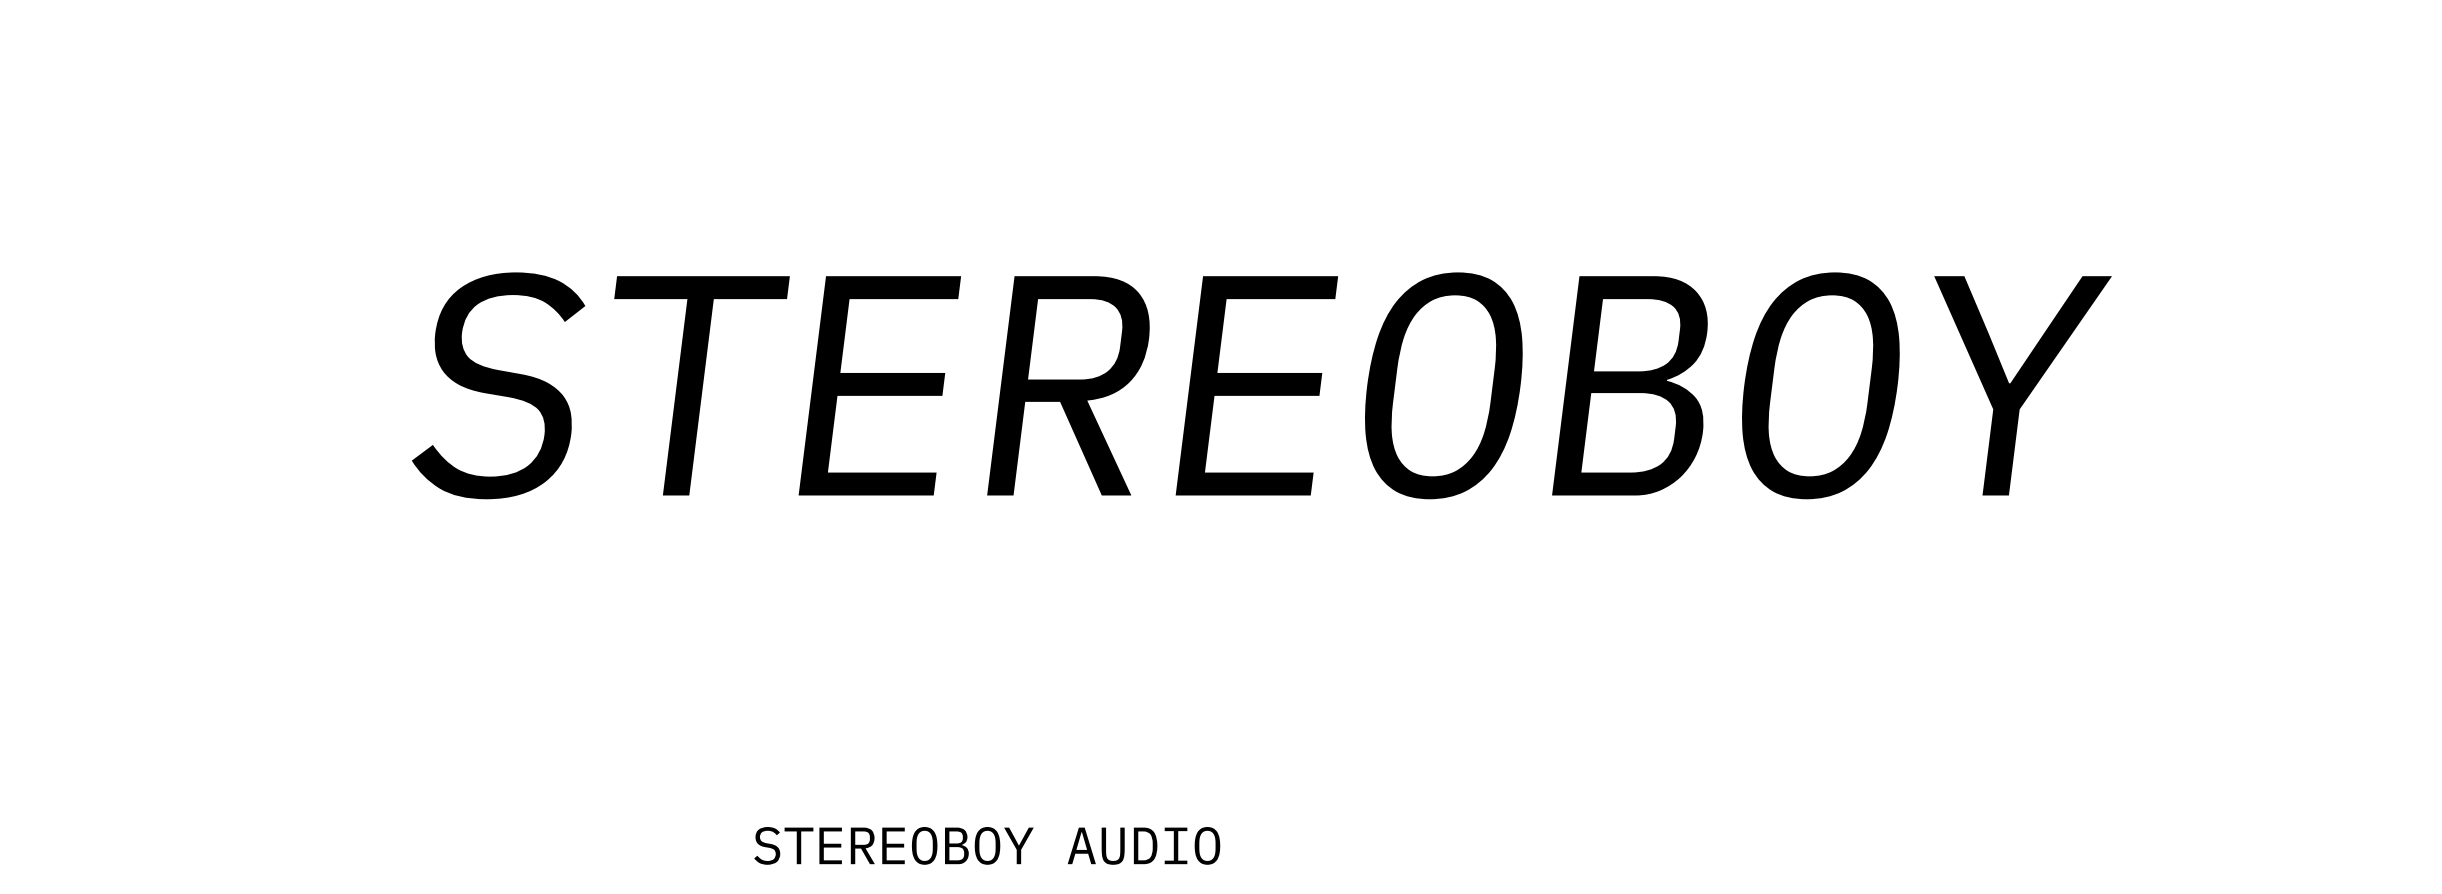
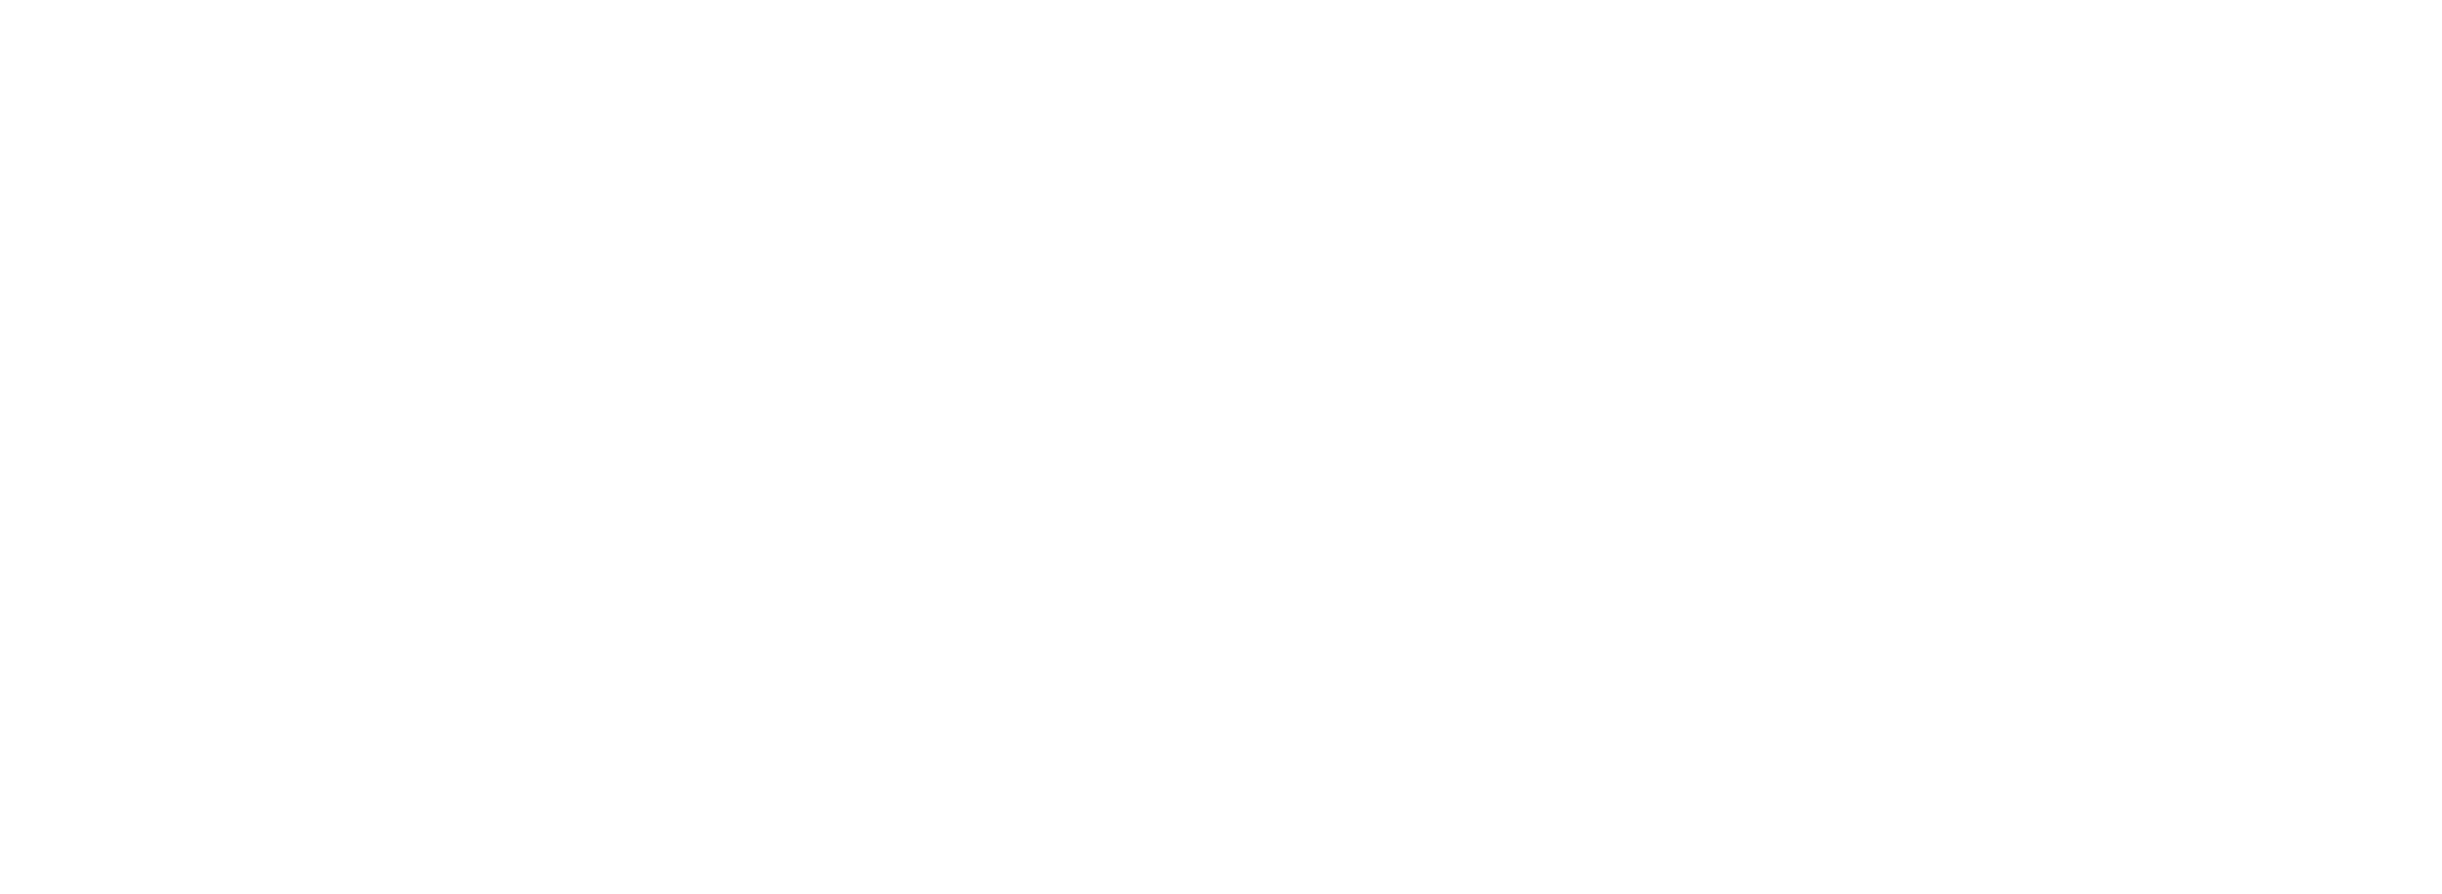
text: STEREOBOY (1261, 385) -> none
text: STEREOBOY AUDIO (987, 845) -> none

